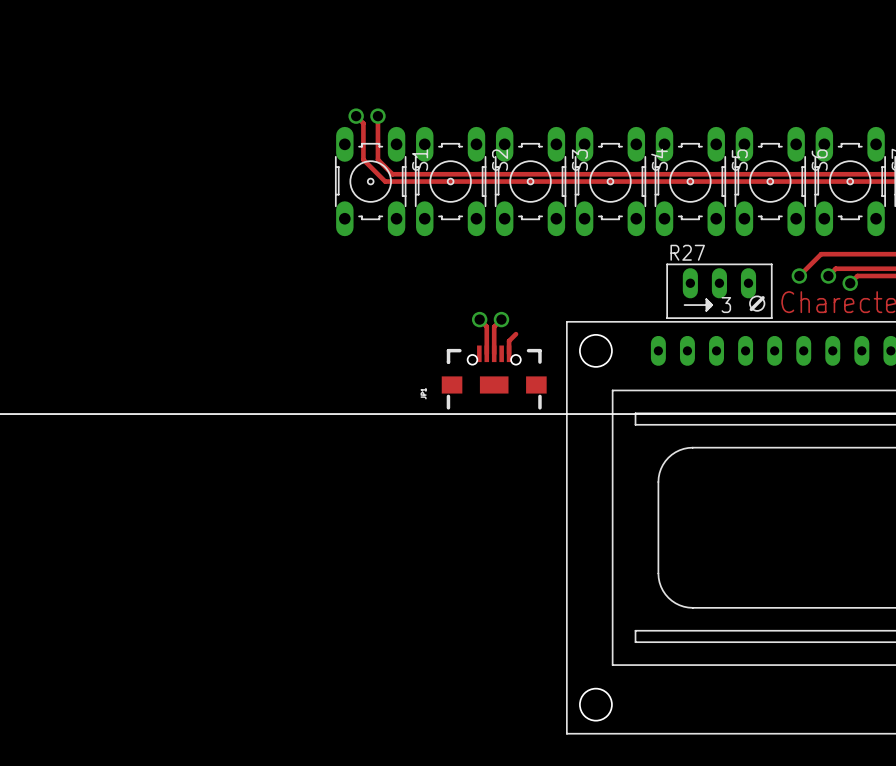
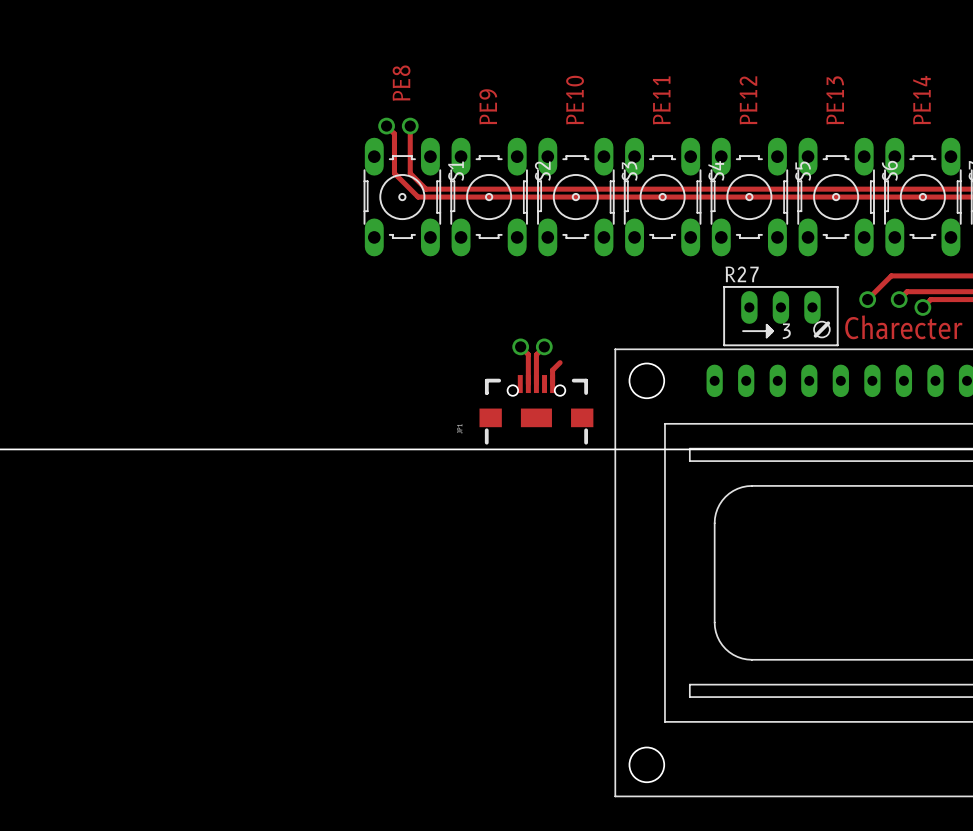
text: none -> PE8 (401, 83)
text: none -> PE14 (921, 100)
text: none -> PE10 (575, 100)
text: none -> PE11 (661, 100)
text: none -> PE12 (748, 100)
text: none -> PE13 (835, 100)
text: none -> PE9 (488, 106)

